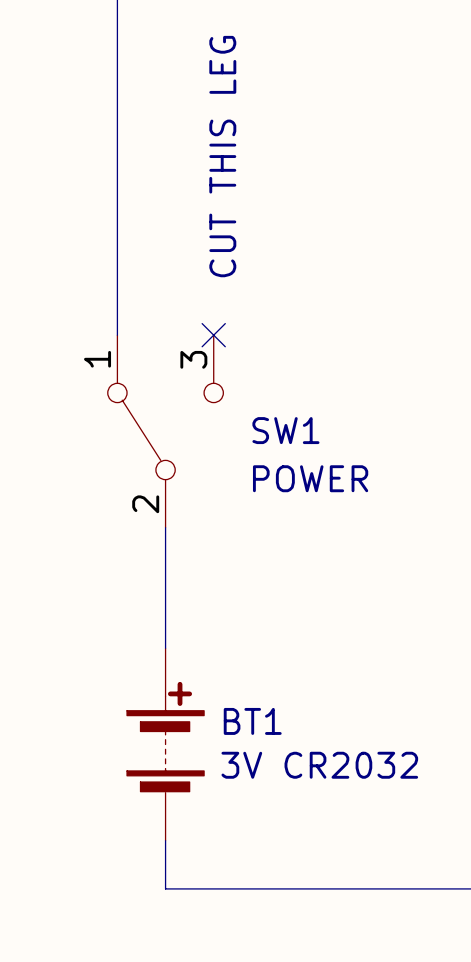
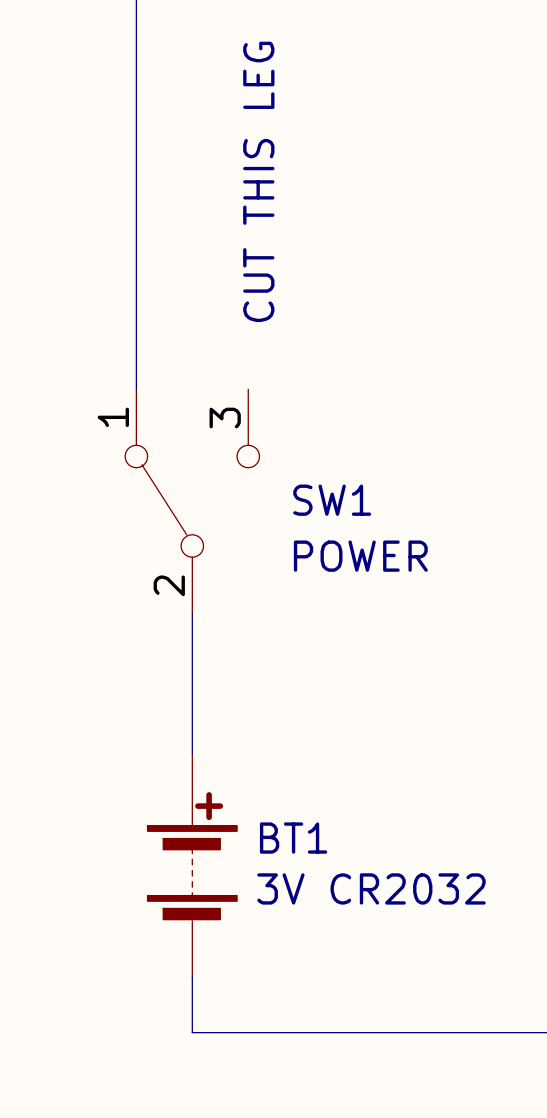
no-connect mark: (213, 335) -> none

